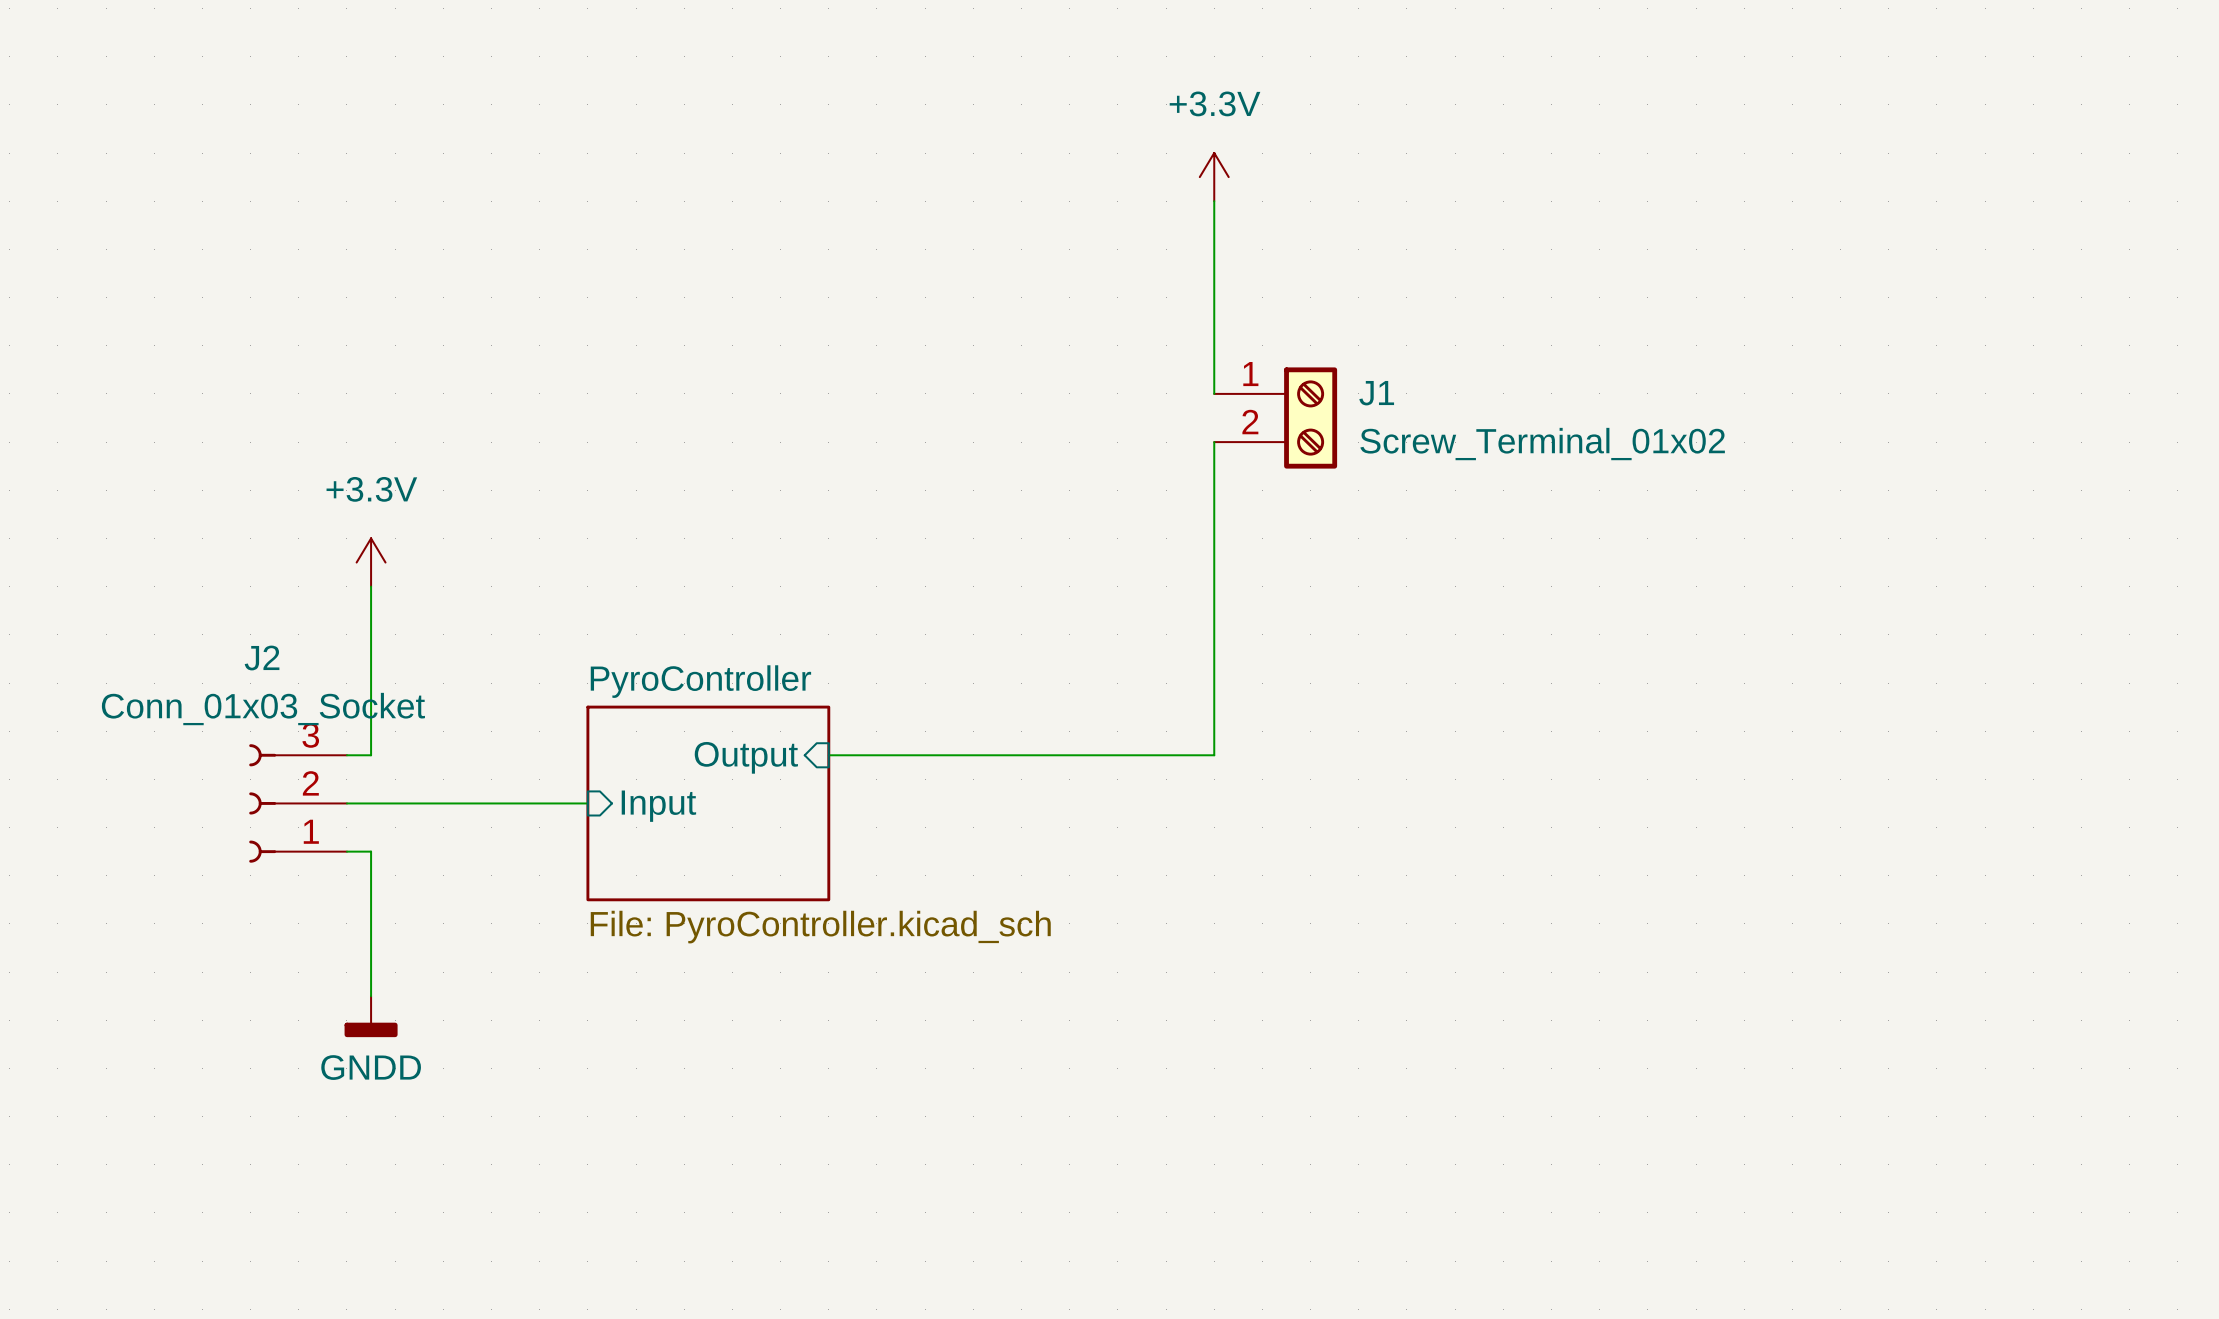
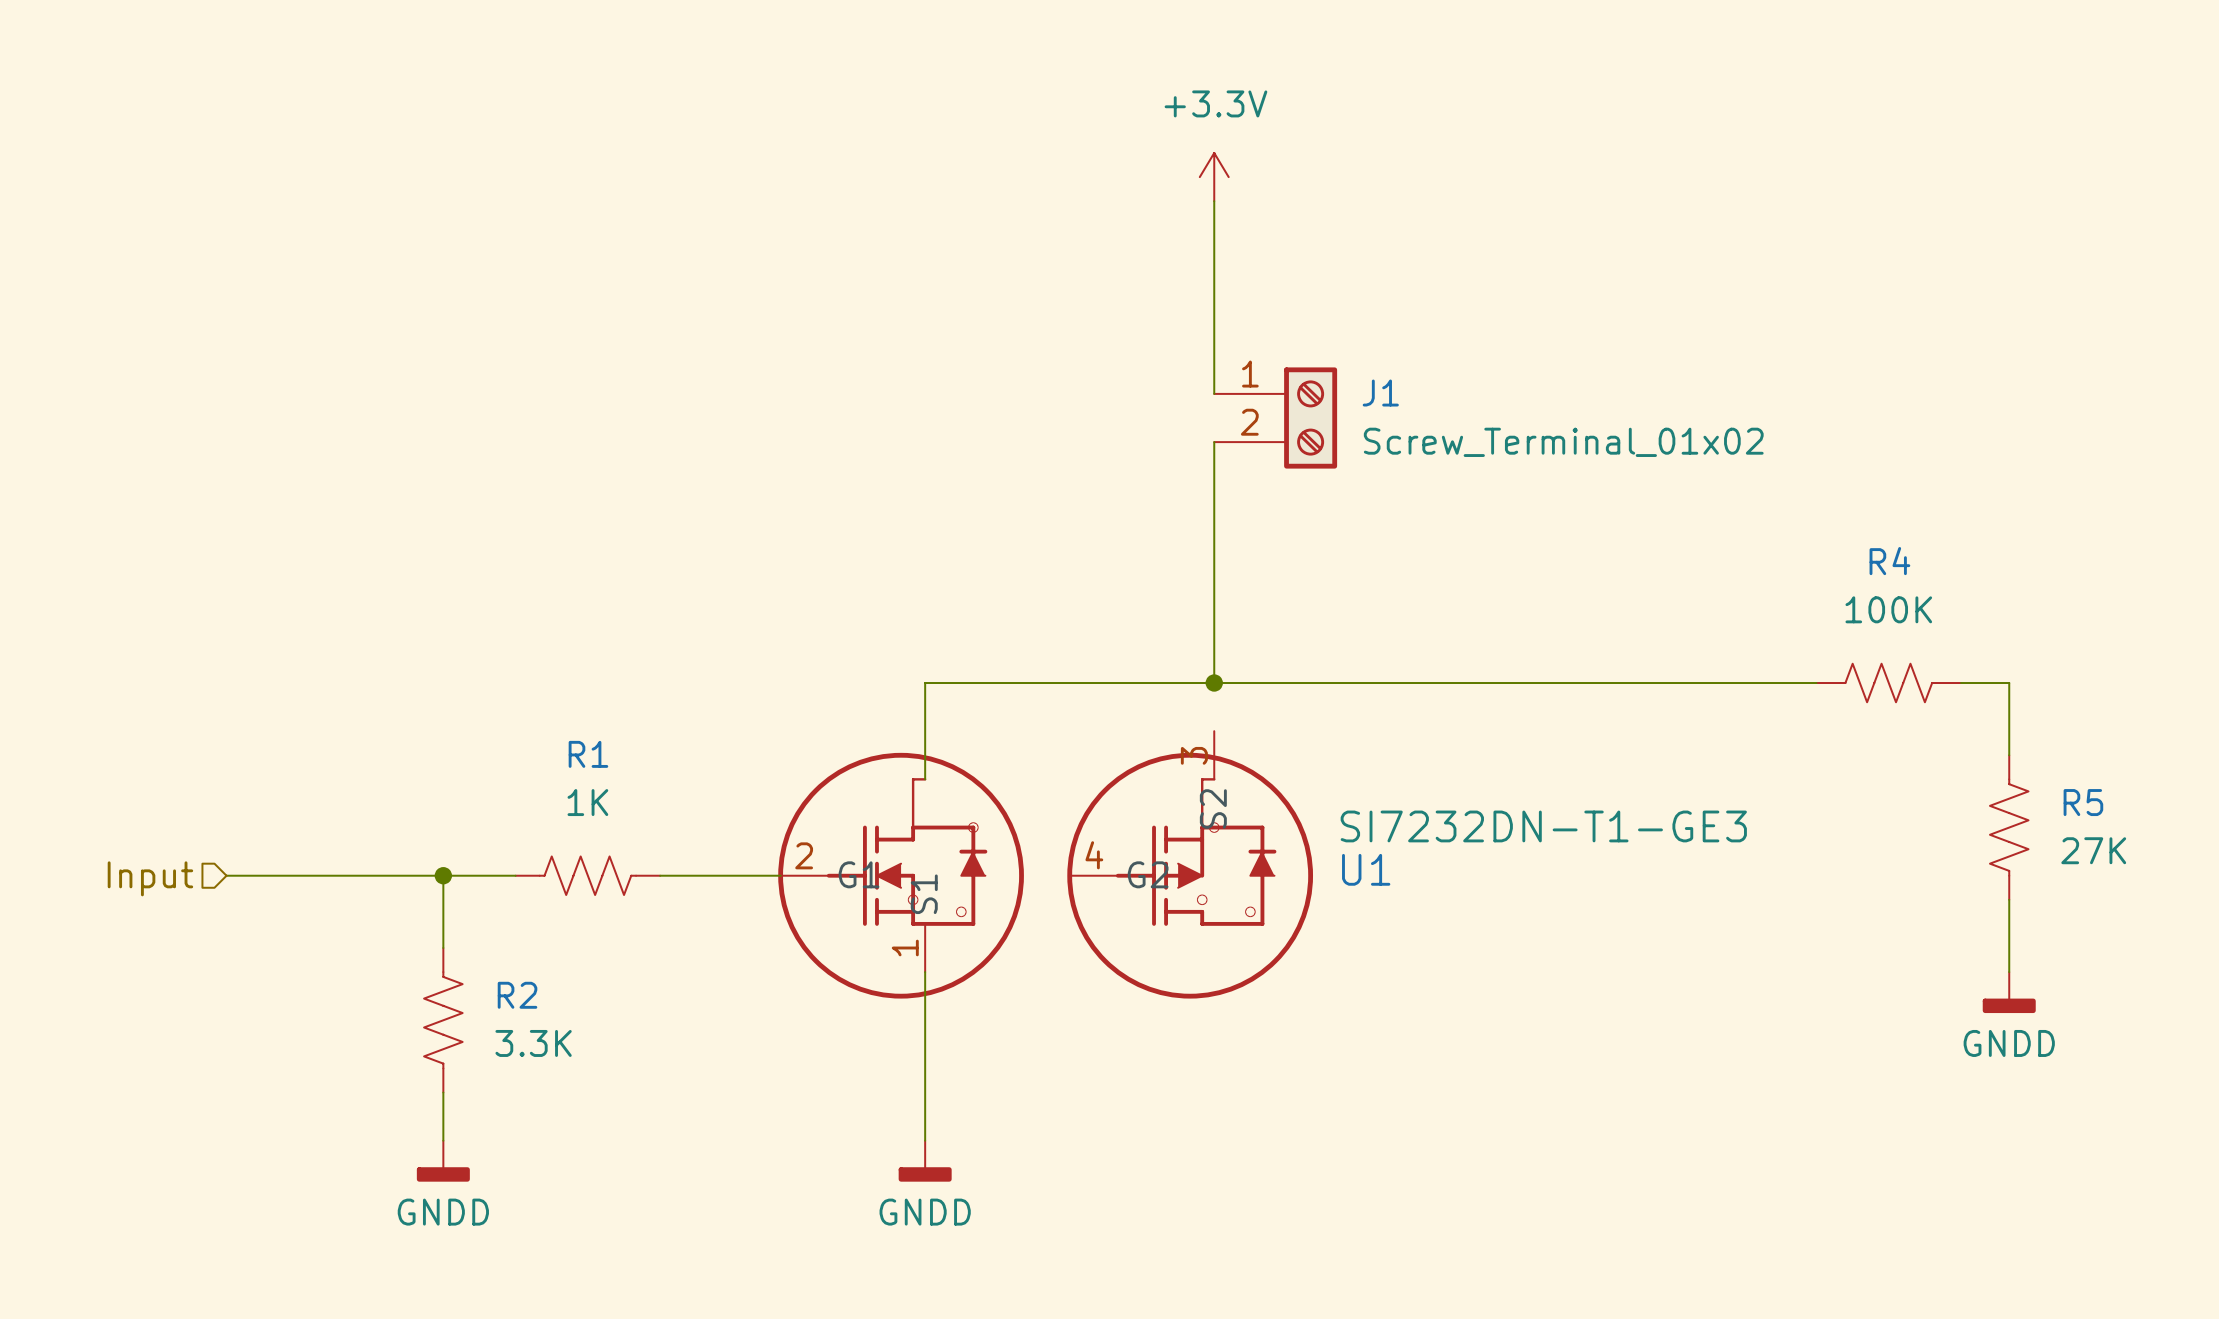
power symbol: +3.3V (371, 562) -> none
wire: (371, 586) (371, 755) (346, 755) -> none
wire: (1214, 683) (1214, 755) (828, 755) -> none
junction: none -> (1214, 683)
wire: none -> (1816, 683) (925, 683) (925, 779)
R4: none -> 100K (1888, 683)
wire: none -> (1961, 683) (2009, 683) (2009, 755)
sheet pin: Output (746, 757) -> none
J2: Conn_01x03_Socket (298, 803) -> none
wire: (346, 803) (587, 803) -> none
sheet PyroController: File: PyroController.kicad_sch (708, 803) -> none
sheet pin: Input (658, 806) -> none
R5: none -> 27K (2009, 827)
wire: (346, 851) (371, 851) (371, 996) -> none
U1: none -> SI7232DN-T1-GE3 (1045, 864)
wire: none -> (226, 875) (515, 875)
wire: none -> (443, 875) (443, 948)
junction: none -> (443, 875)
R1: none -> 1K (587, 875)
wire: none -> (660, 875) (780, 875)
hierarchical label: none -> Input (150, 878)
wire: none -> (2009, 899) (2009, 972)
wire: none -> (925, 972) (925, 1140)
power symbol: none -> GNDD (2009, 992)
power symbol position: GNDD (371, 1016) -> GNDD (443, 1161)
R2: none -> 3.3K (443, 1020)
wire: none -> (443, 1092) (443, 1140)
power symbol: none -> GNDD (925, 1161)

